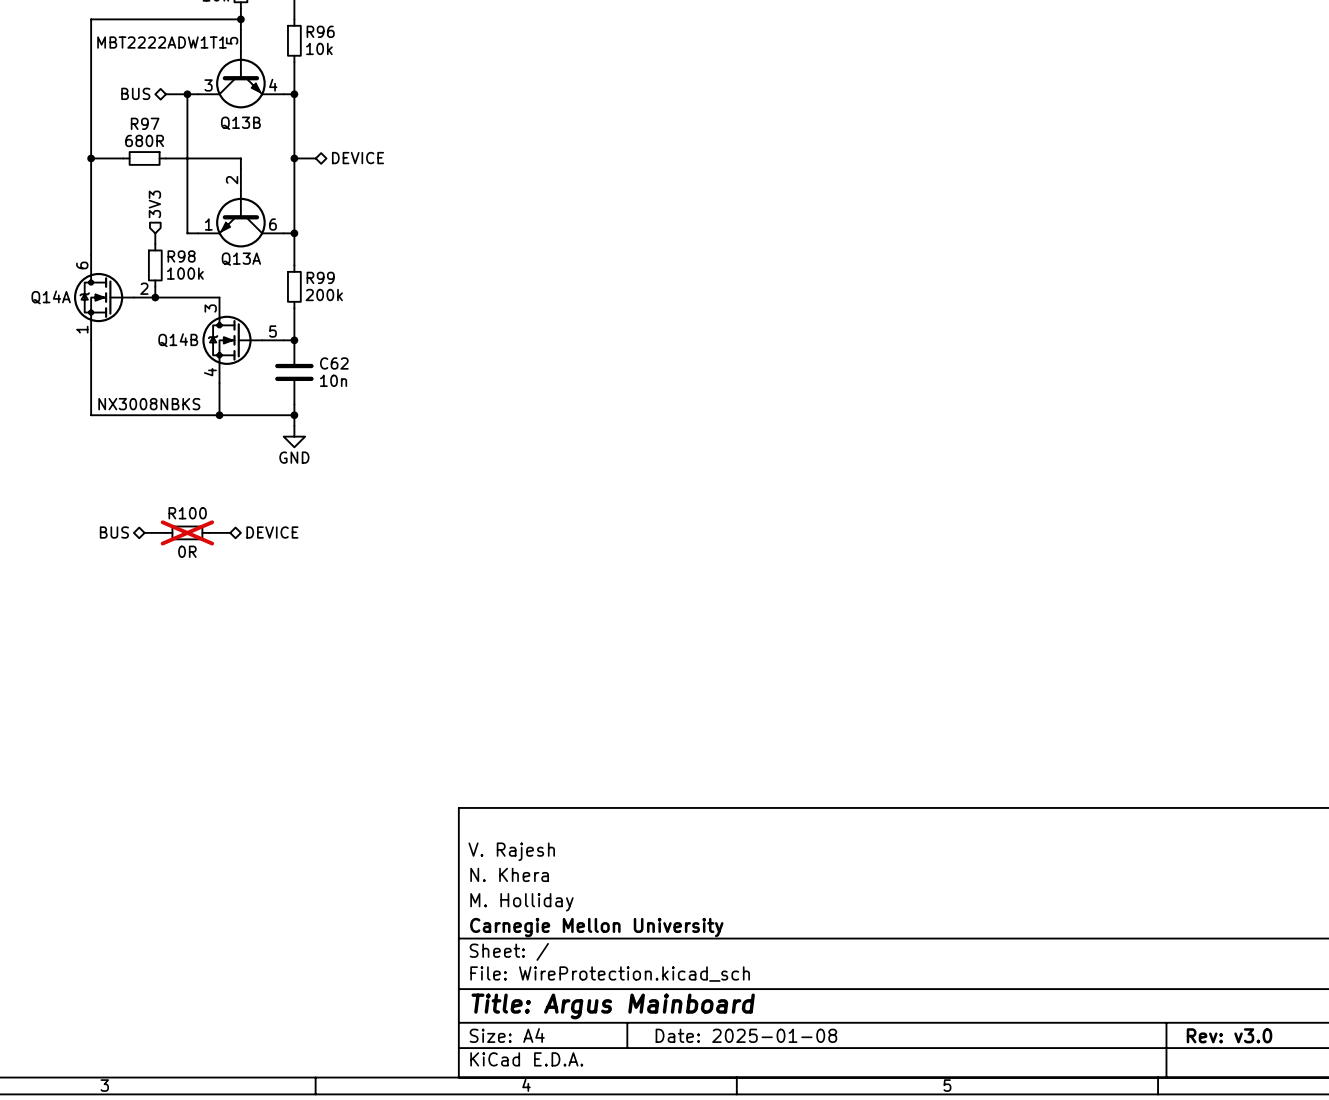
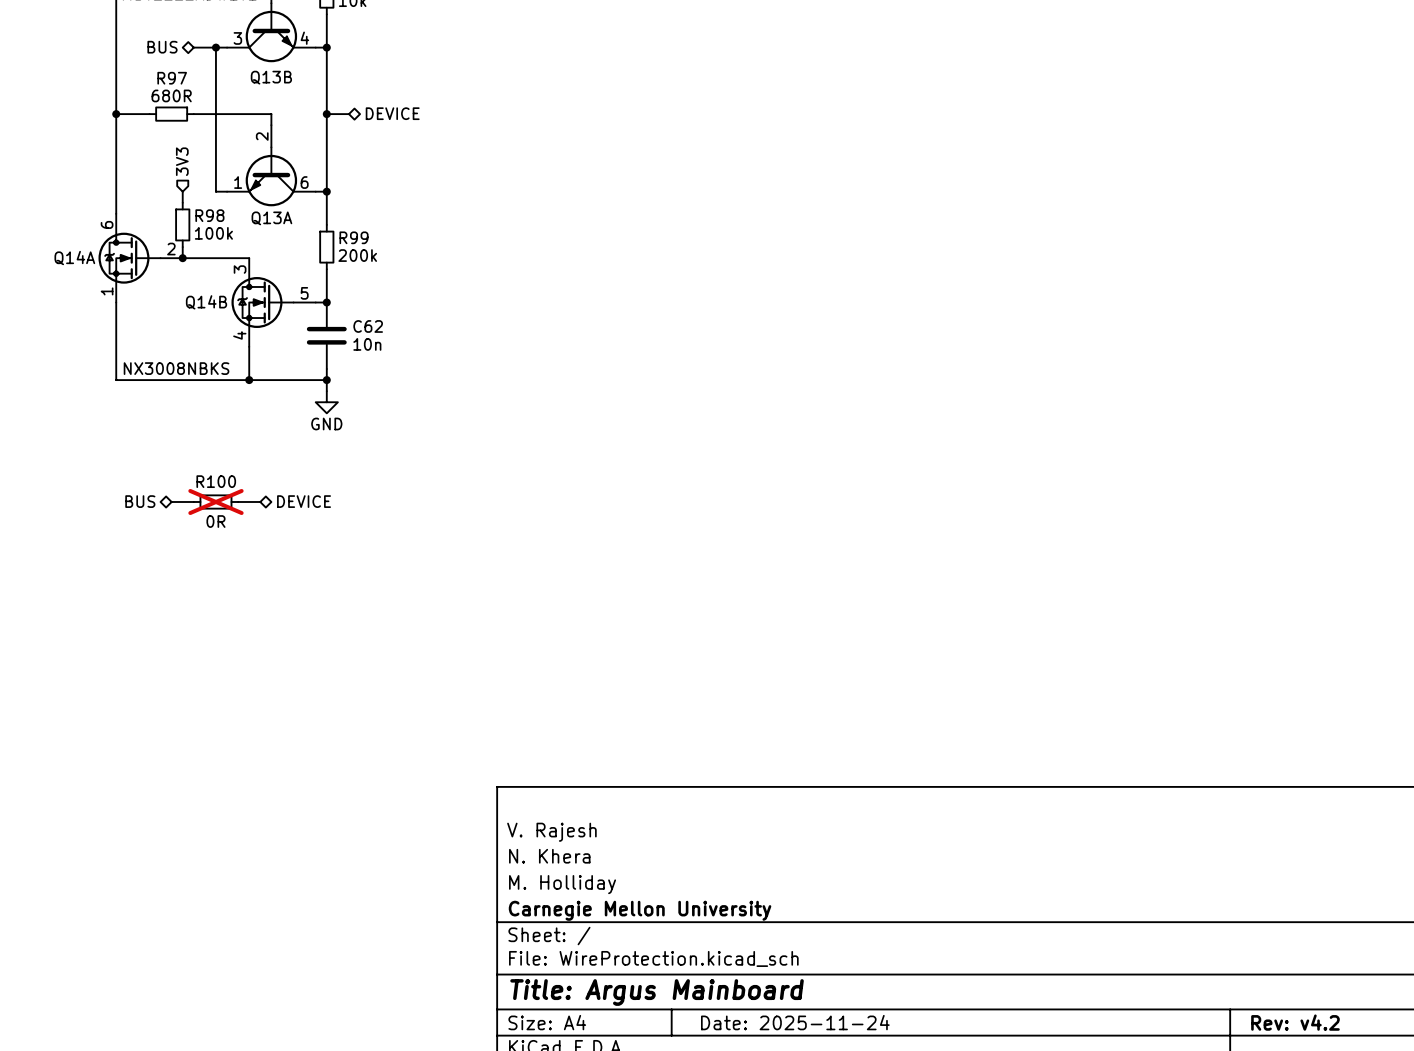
title block: Date: 2025-01-08 (746, 1035) -> Date: 2025-11-24 (795, 1022)
title block: Rev: v3.0 (1229, 1035) -> Rev: v4.2 (1295, 1022)

